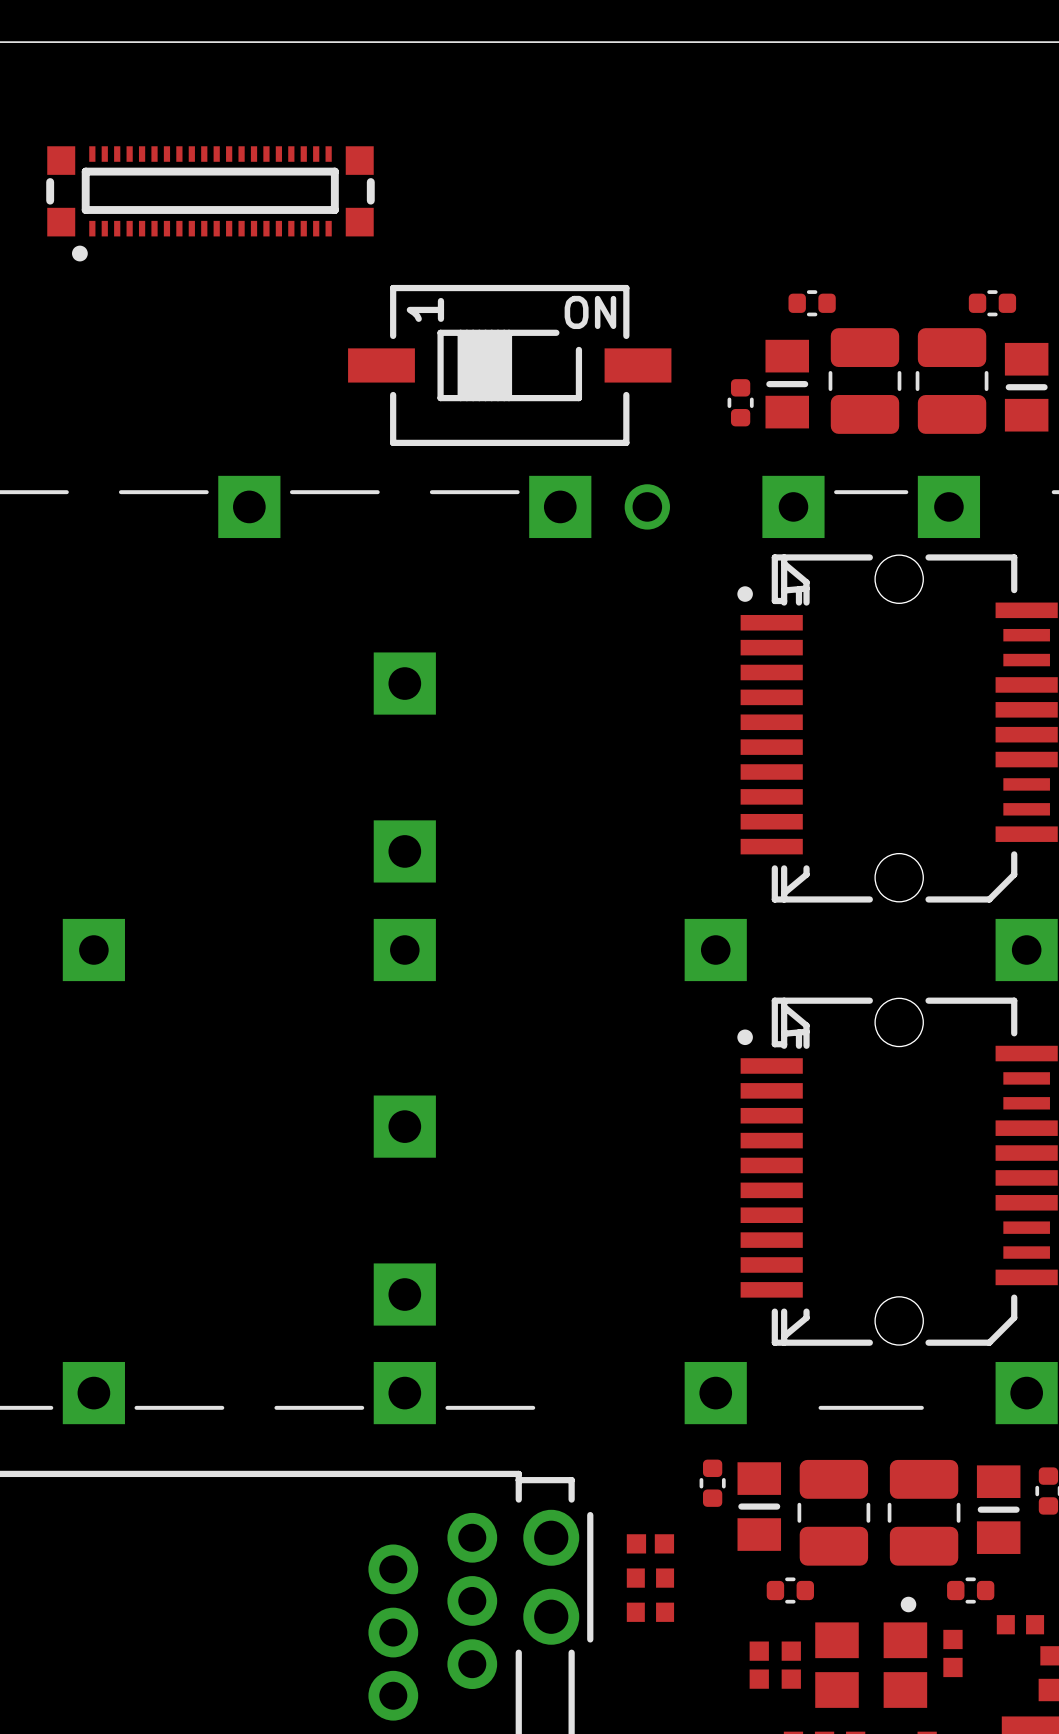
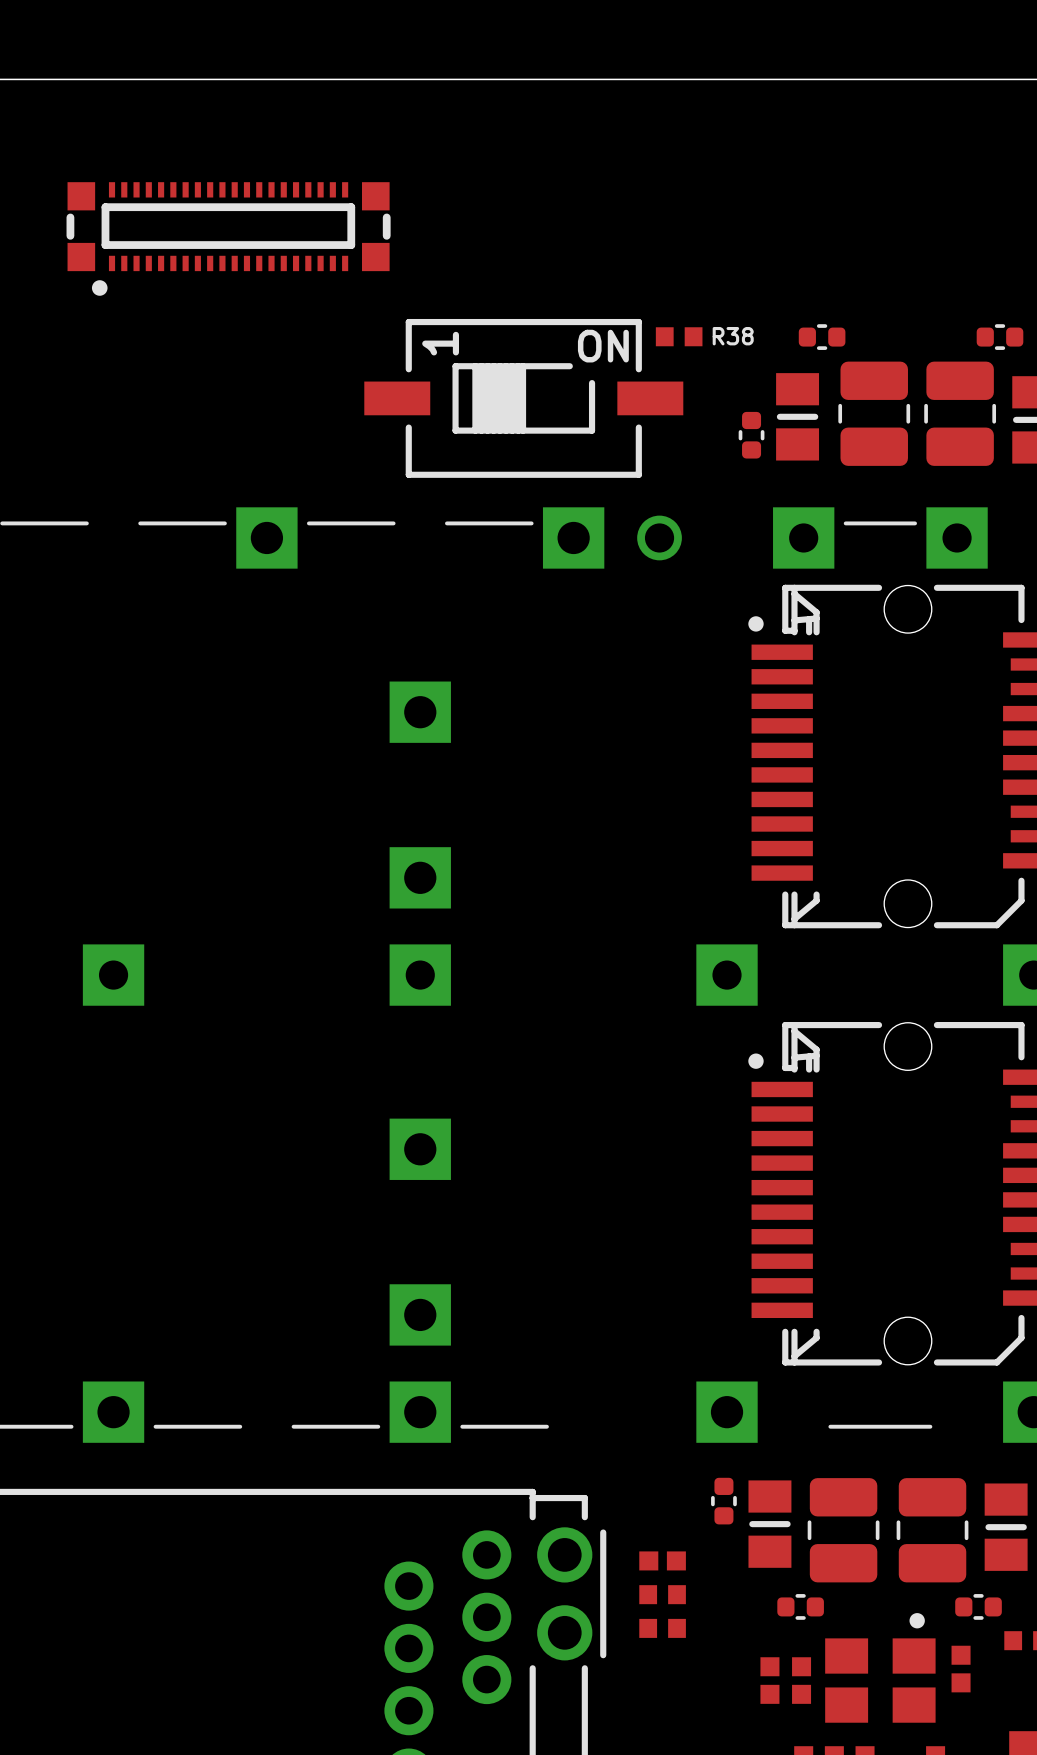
R38: none -> (679, 336)

